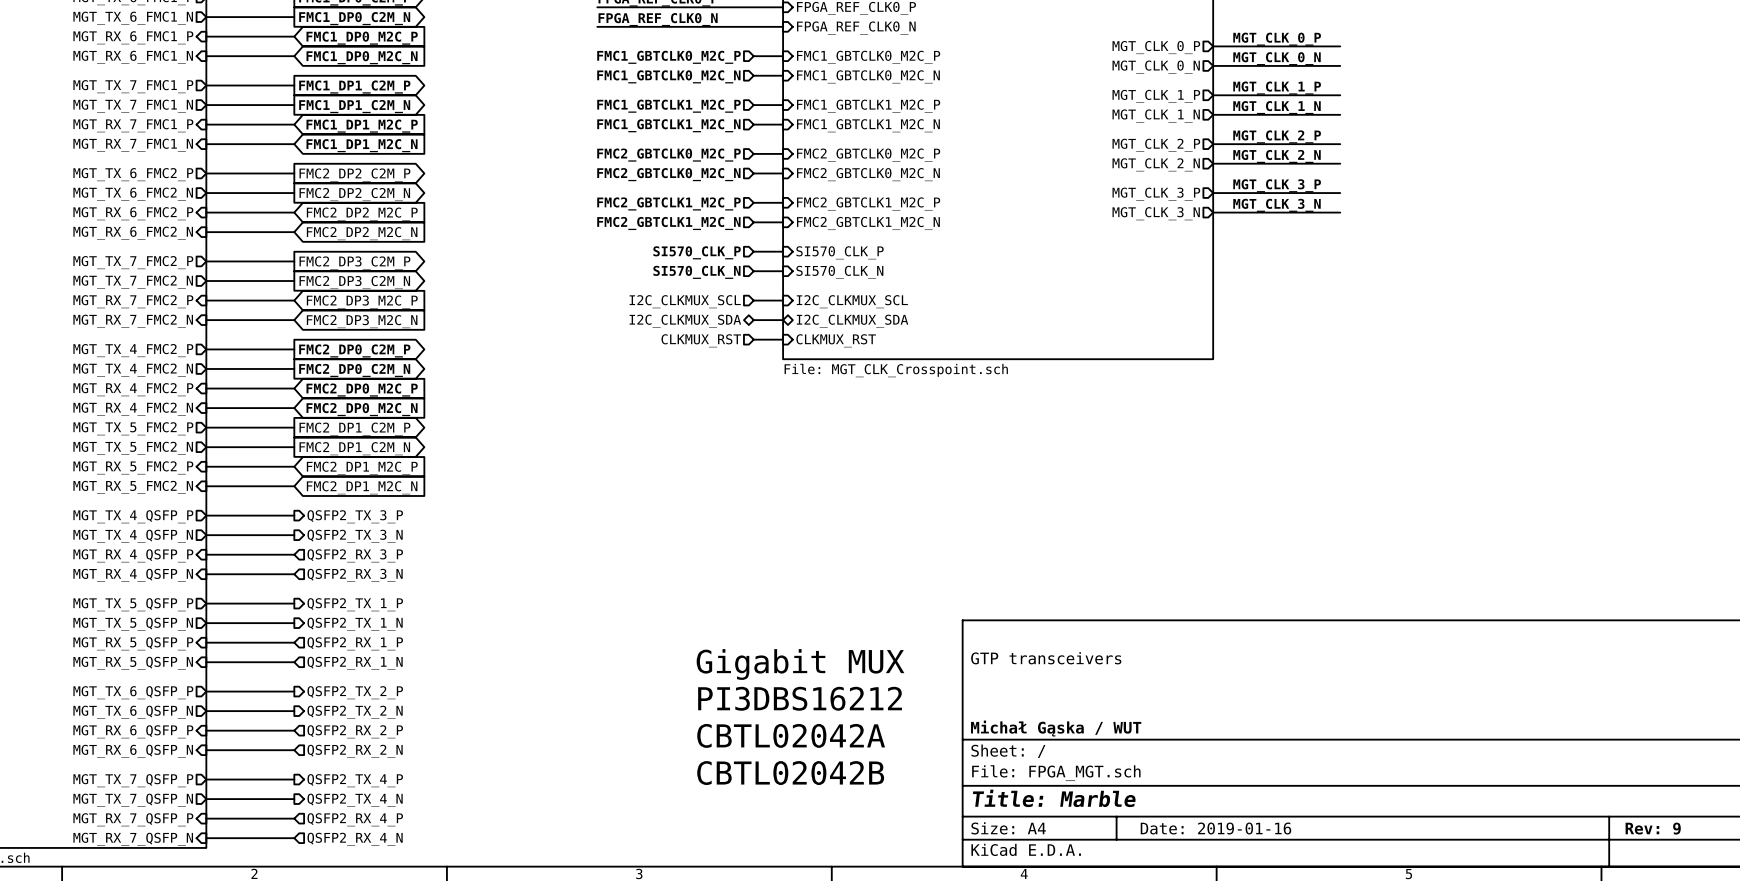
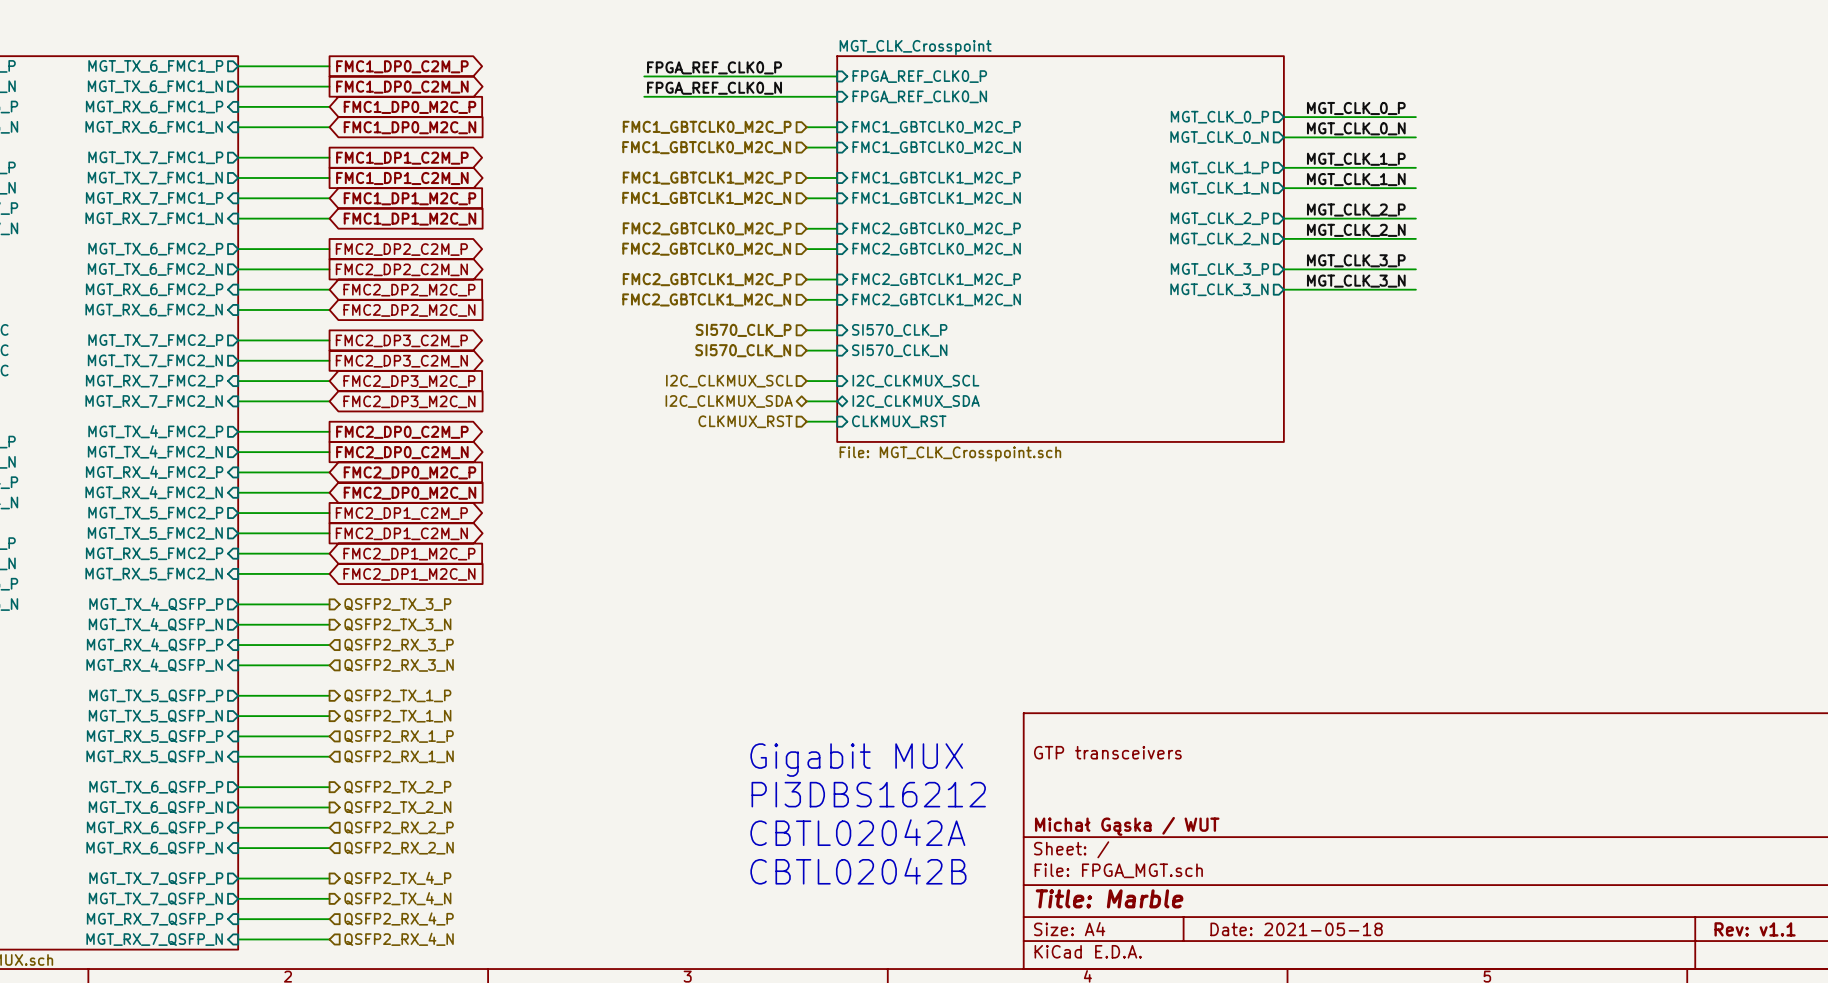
title block: Date: 2019-01-16 (1215, 828) -> Date: 2021-05-18 (1296, 929)
title block: Rev: 9 (1653, 828) -> Rev: v1.1 (1755, 929)

